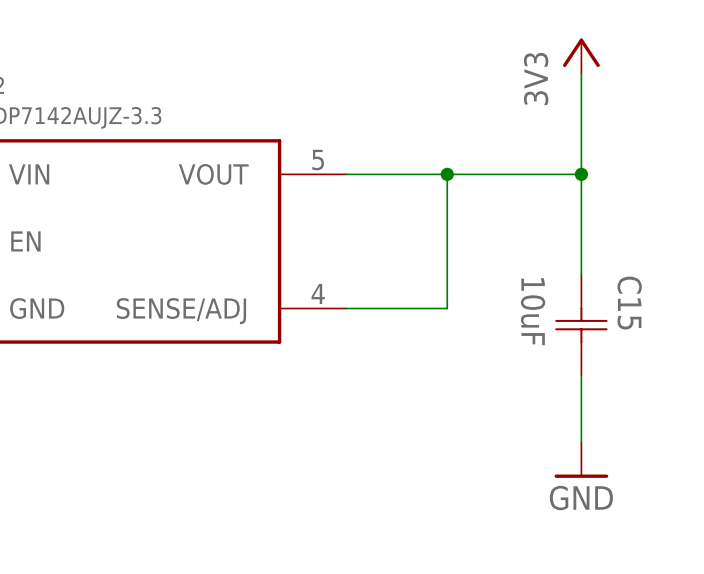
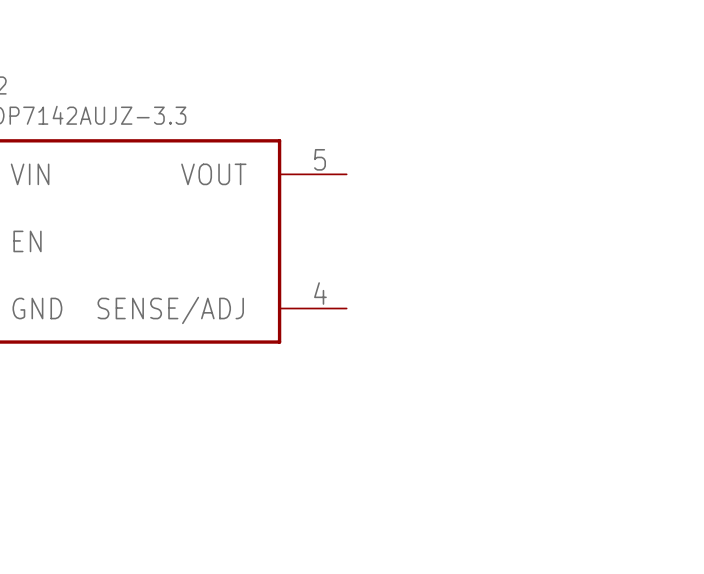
power symbol: 3V3 (581, 56) -> none
wire: (581, 73) (581, 274) -> none
wire: (346, 174) (581, 174) -> none
wire: (447, 174) (447, 308) (346, 308) -> none
junction: (447, 174) -> none
junction: (581, 174) -> none
C15: 10uF (581, 325) -> none
wire: (581, 375) (581, 442) -> none
power symbol: GND (581, 460) -> none

